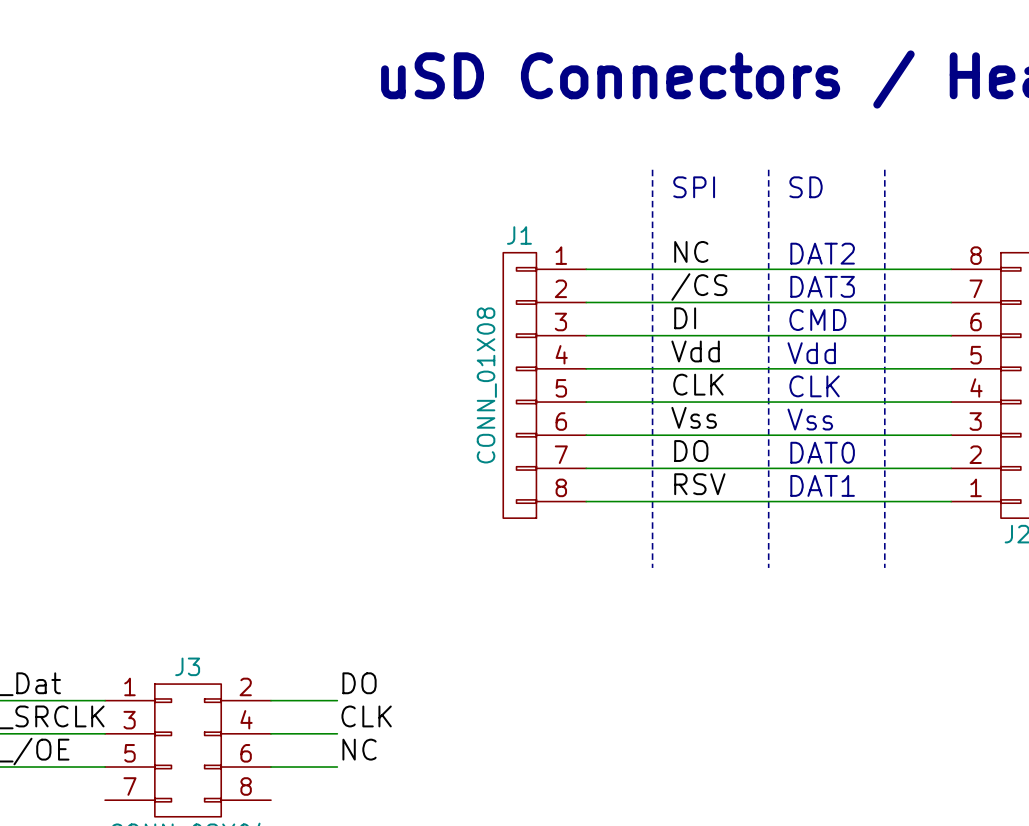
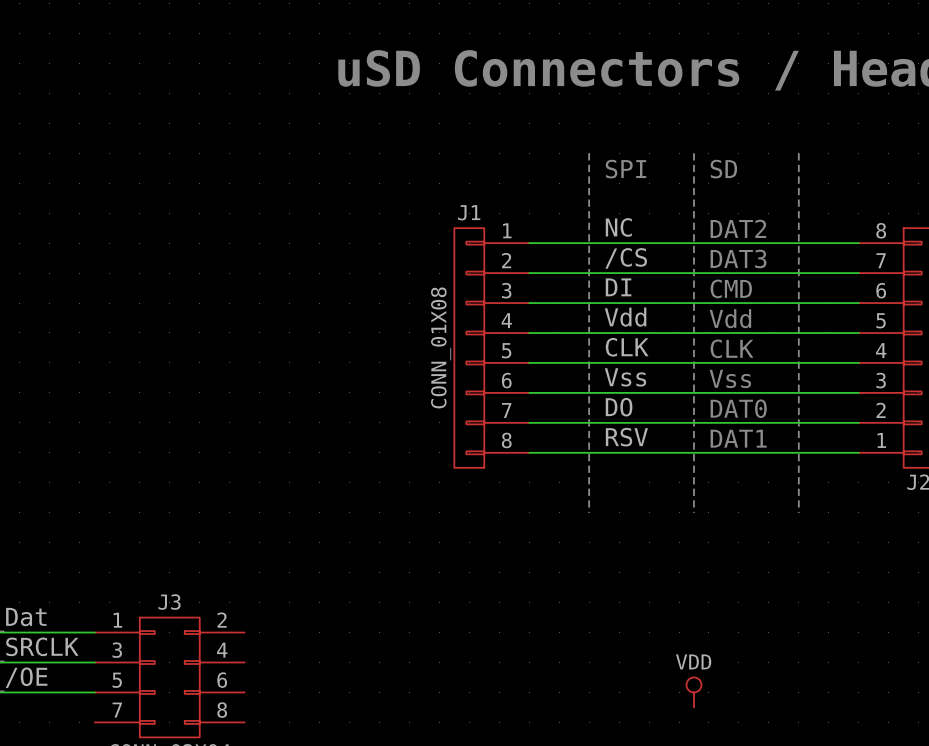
label: DO (359, 683) -> none
wire: (270, 700) (337, 700) -> none
label: CLK (366, 716) -> none
wire: (270, 733) (337, 733) -> none
label: NC (359, 749) -> none
wire: (270, 767) (337, 767) -> none
power symbol: none -> VDD (693, 692)

